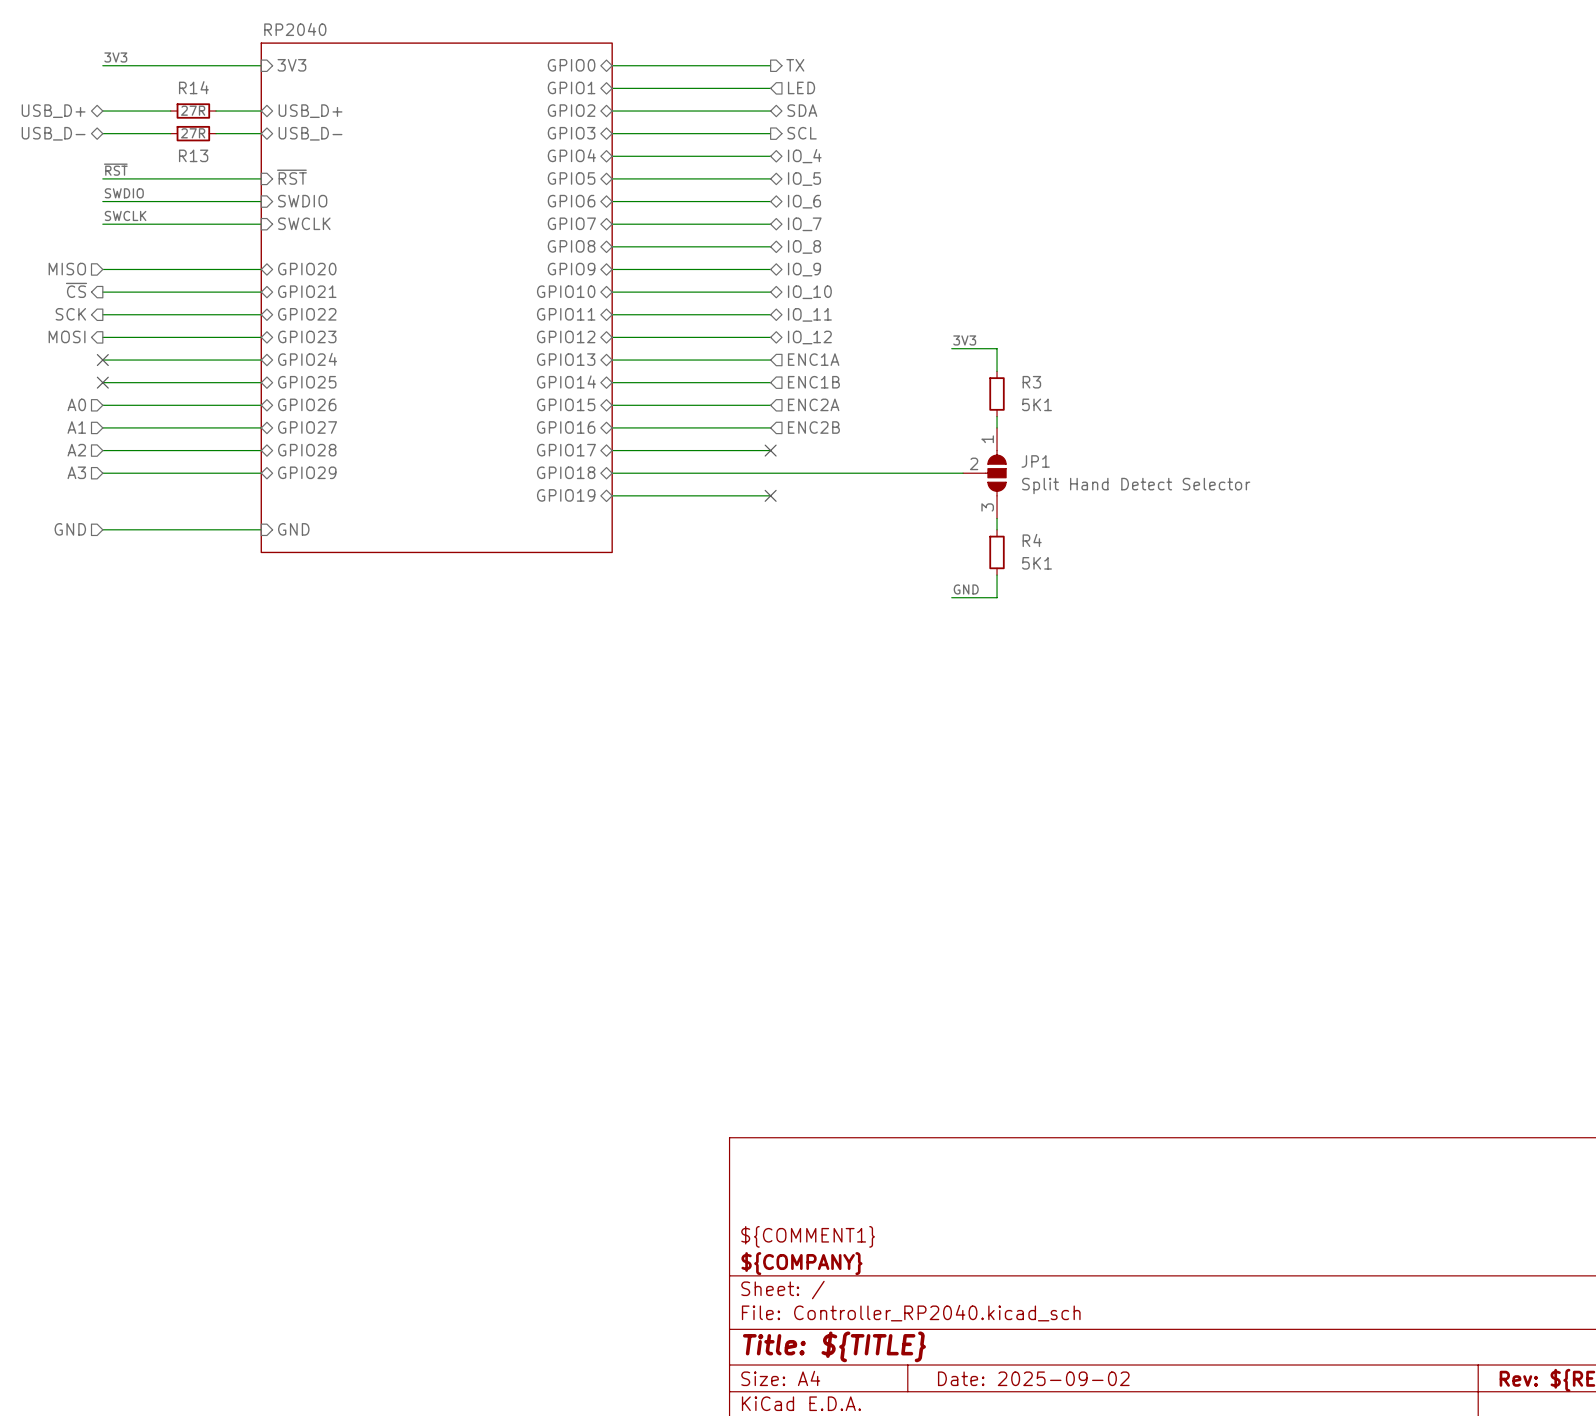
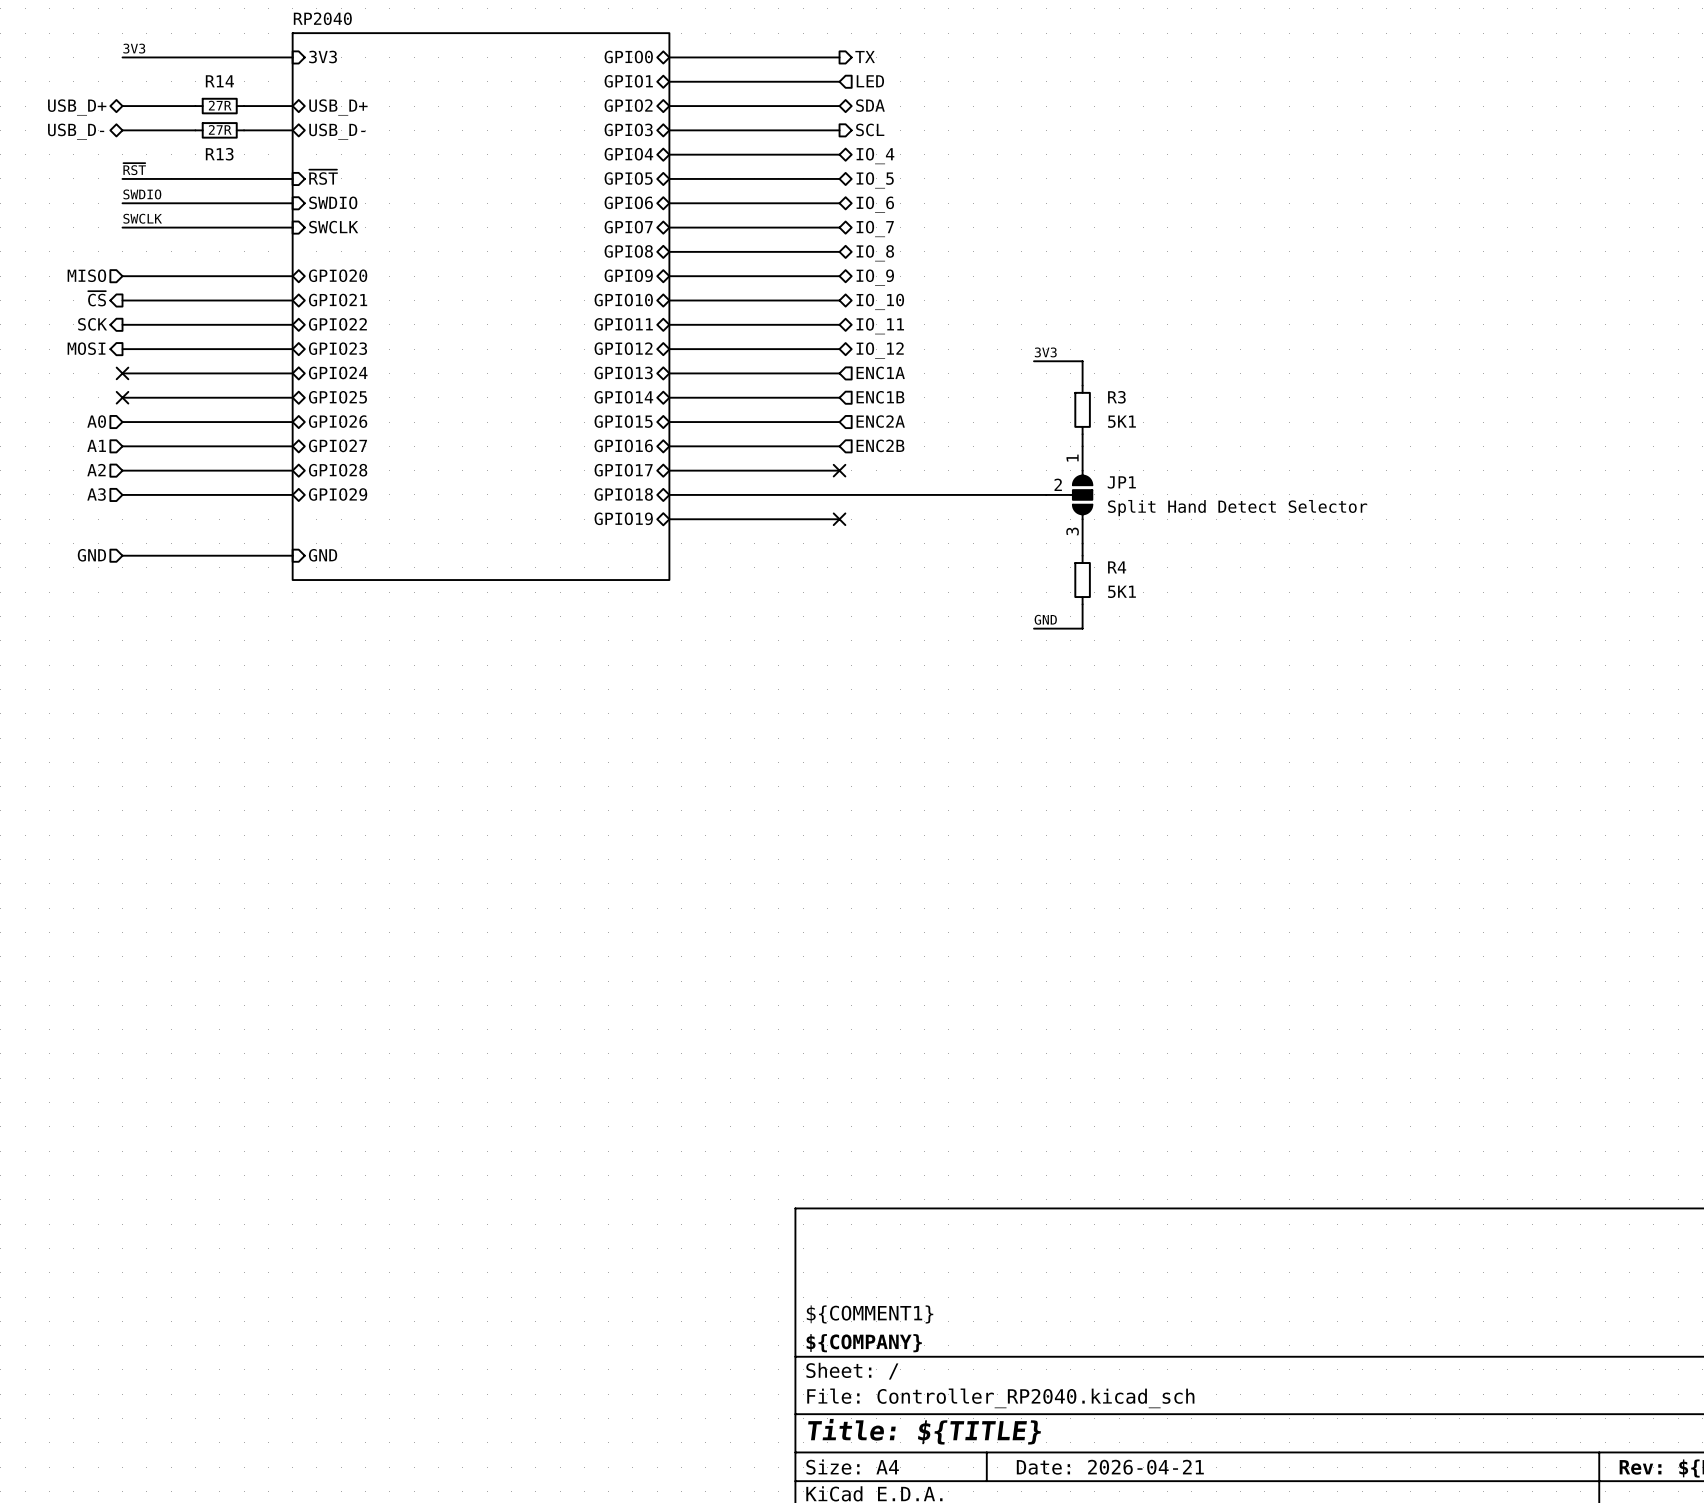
title block: Date: 2025-09-02 (1033, 1378) -> Date: 2026-04-21 (1110, 1467)

